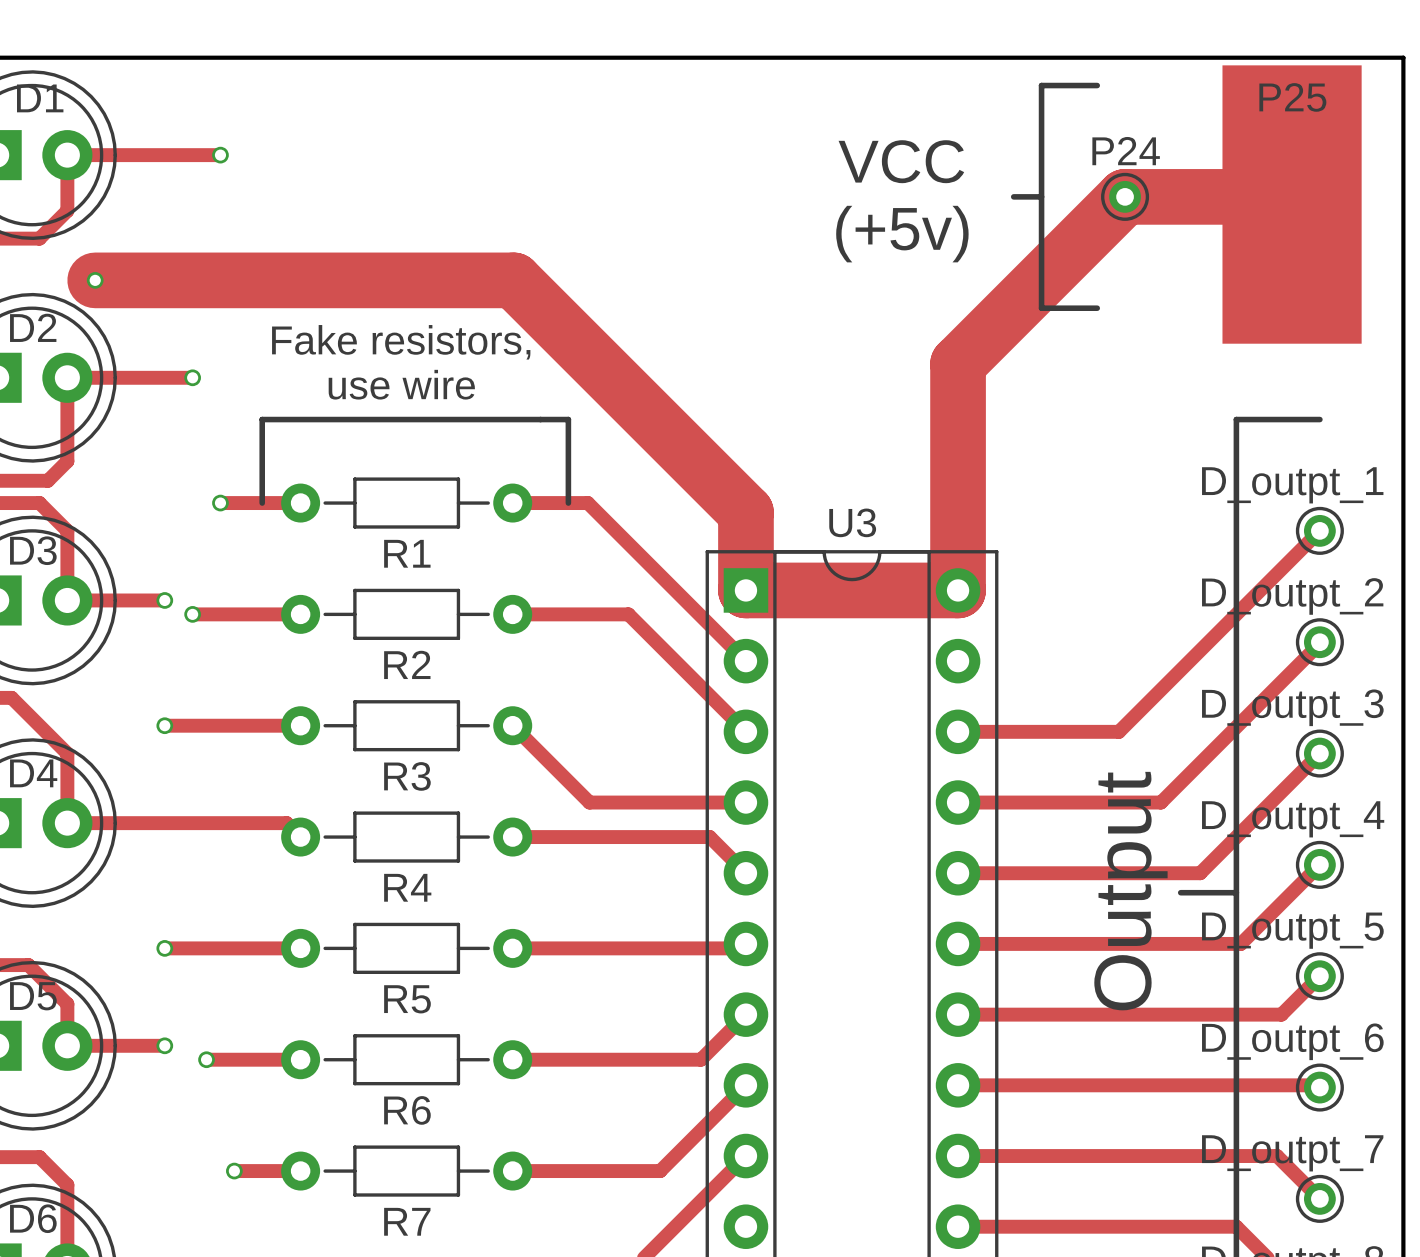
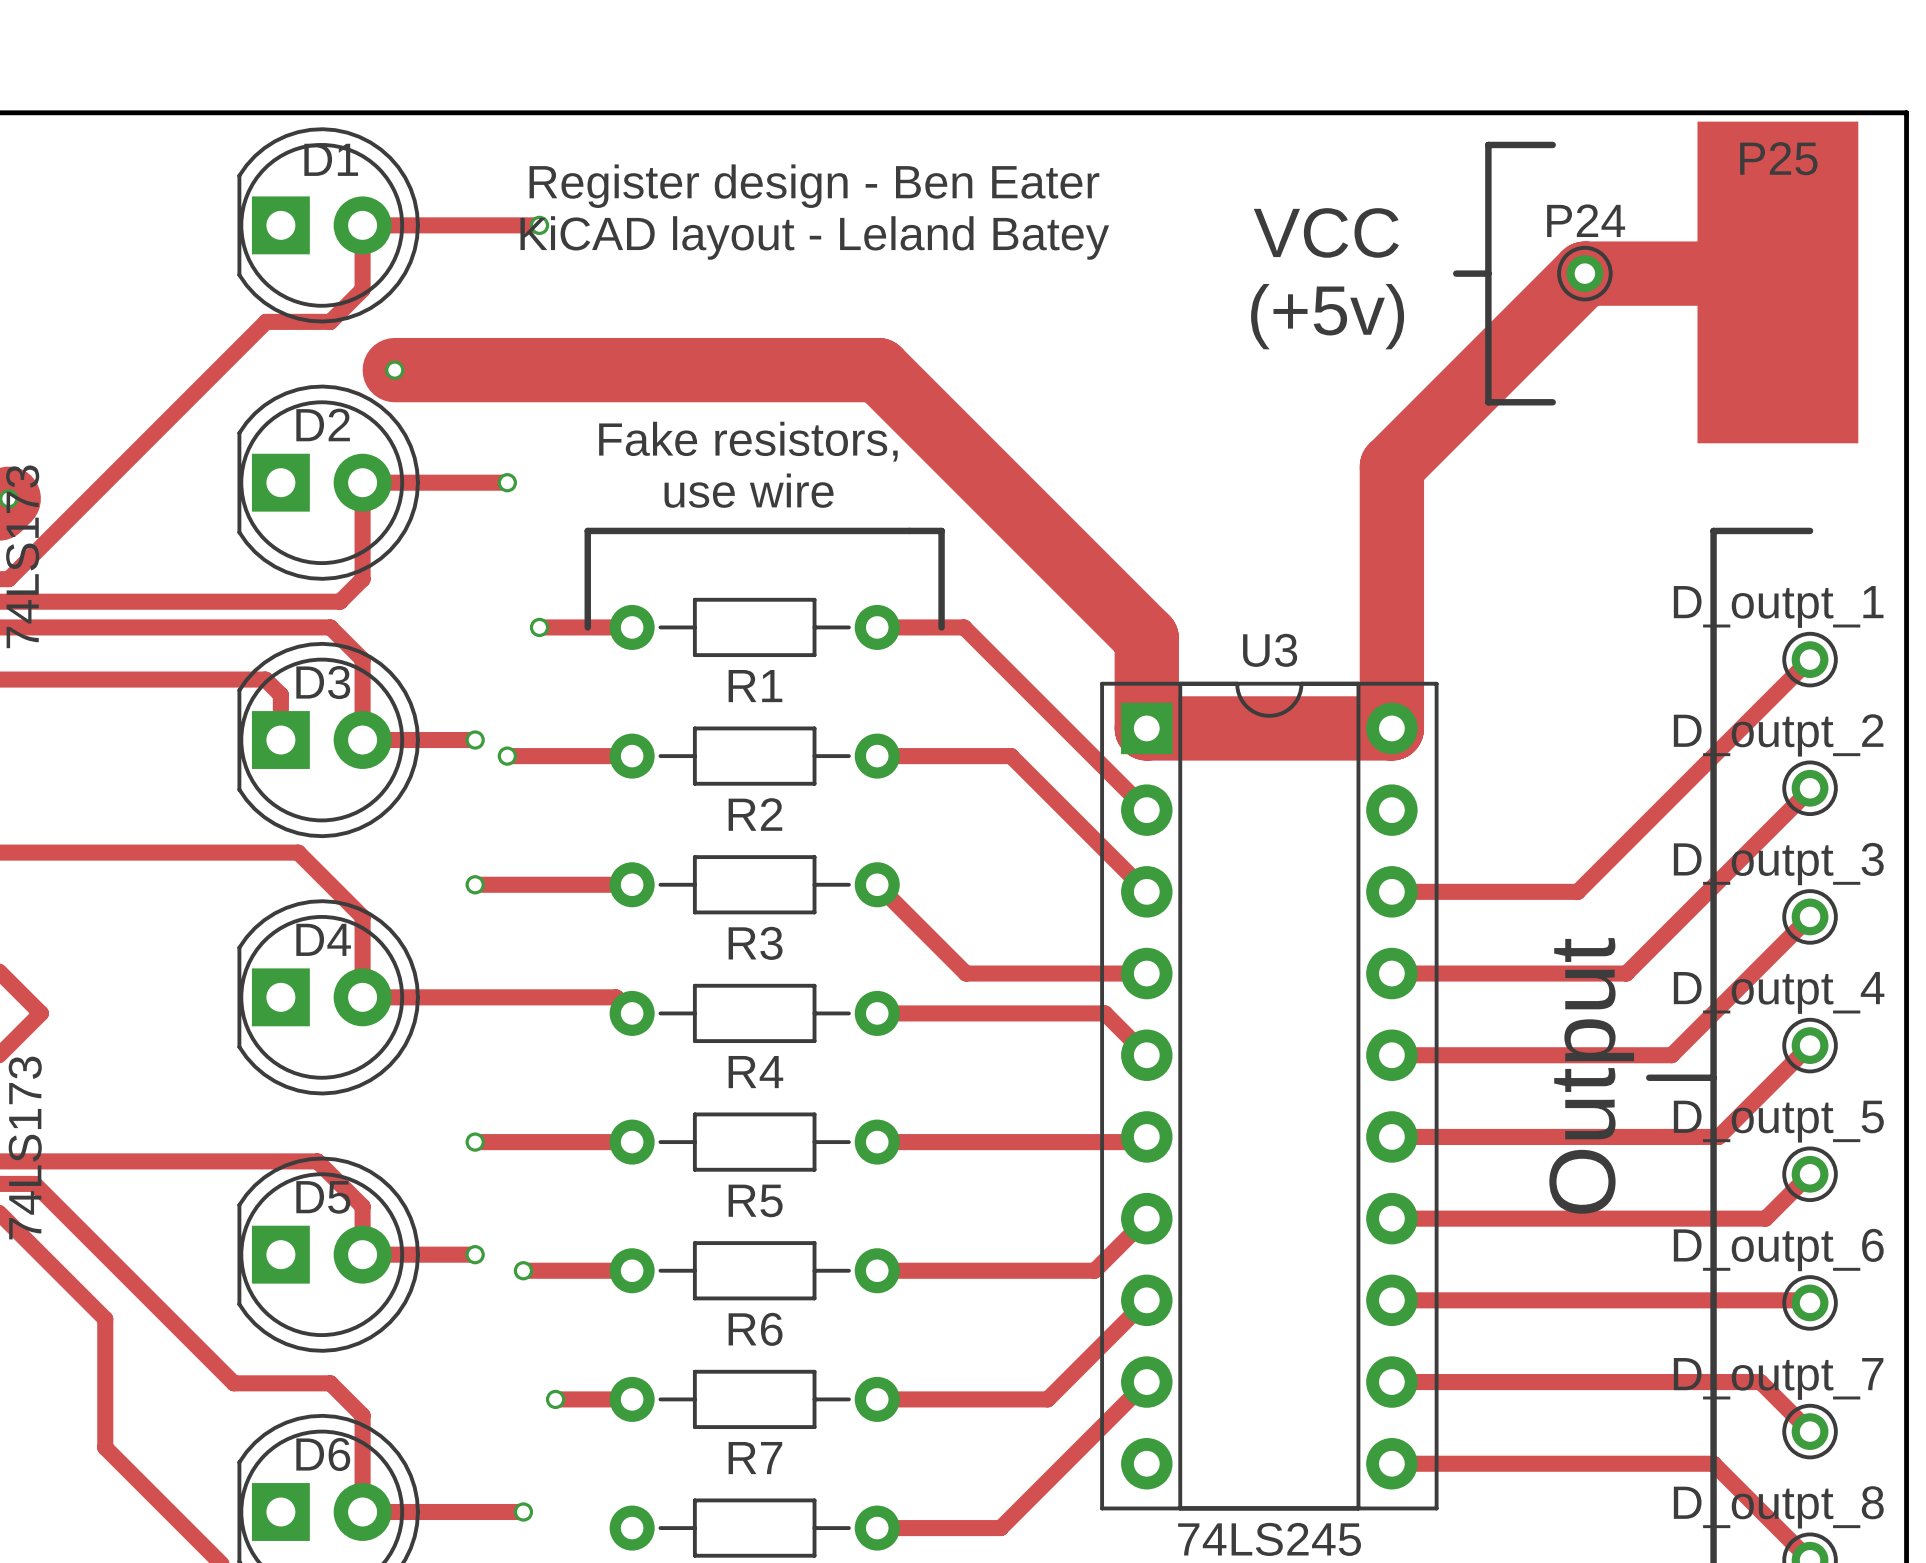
text: none -> Register design - Ben Eater (814, 186)
text: none -> KiCAD layout - Leland Batey (814, 237)

